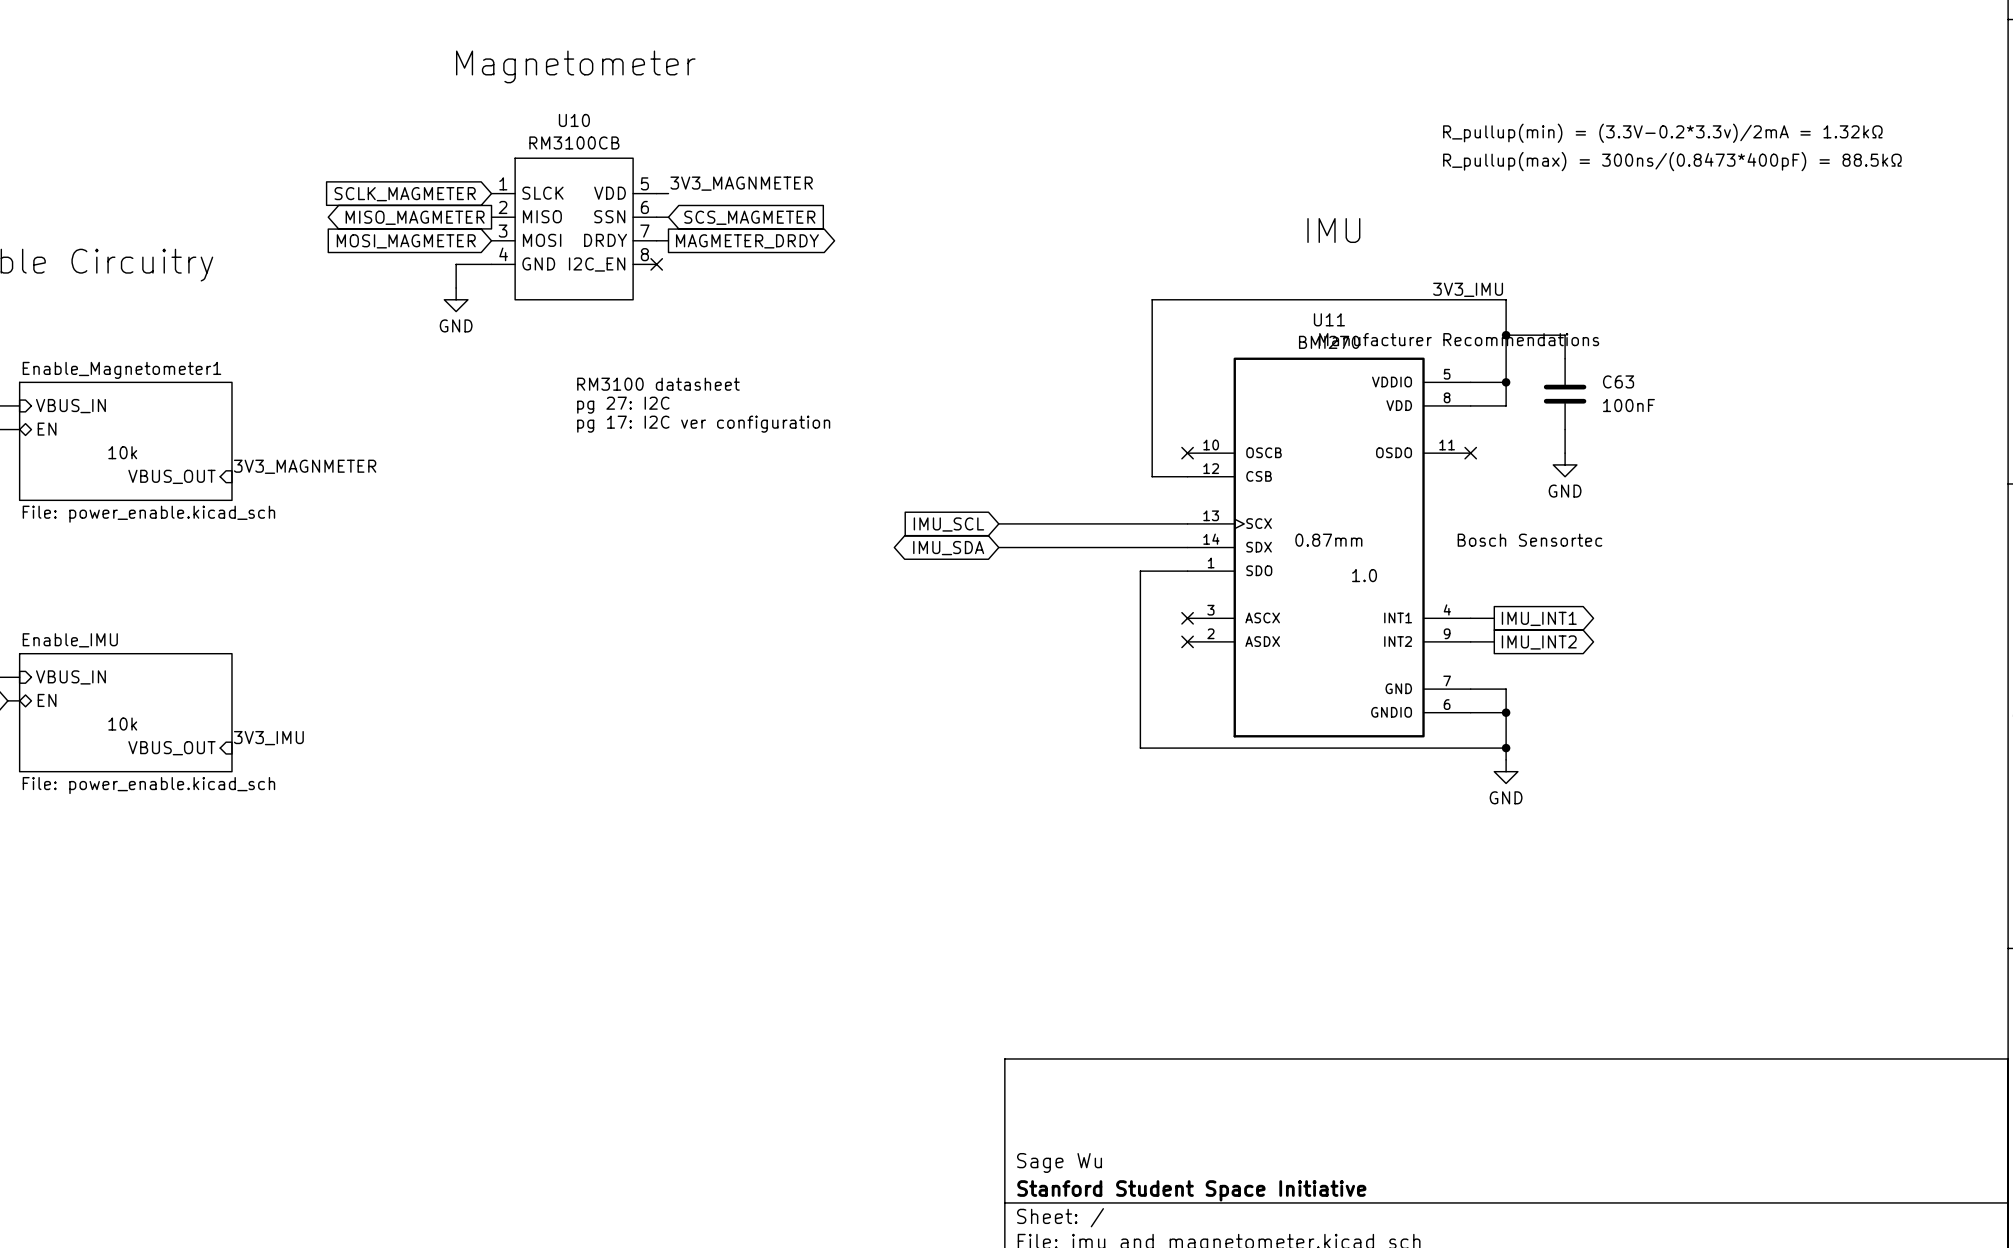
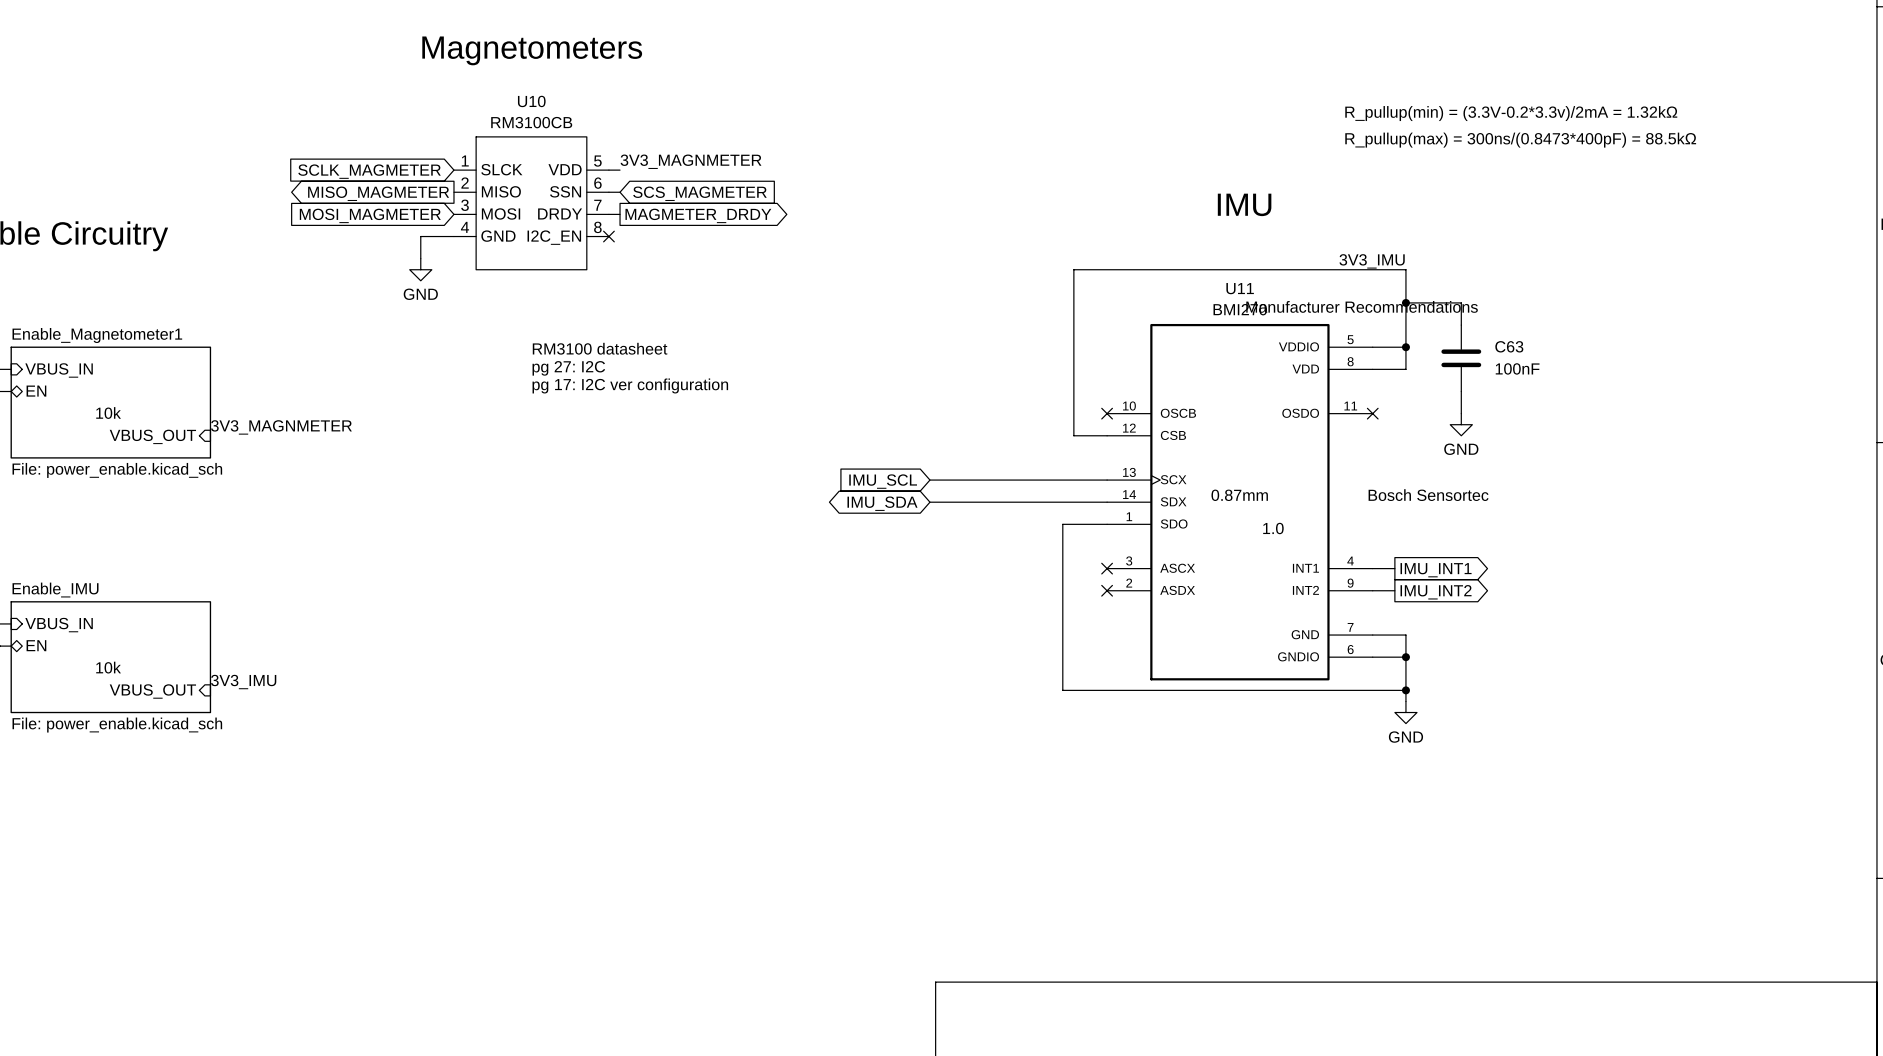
text: Magnetometer (575, 66) -> Magnetometers (532, 50)

